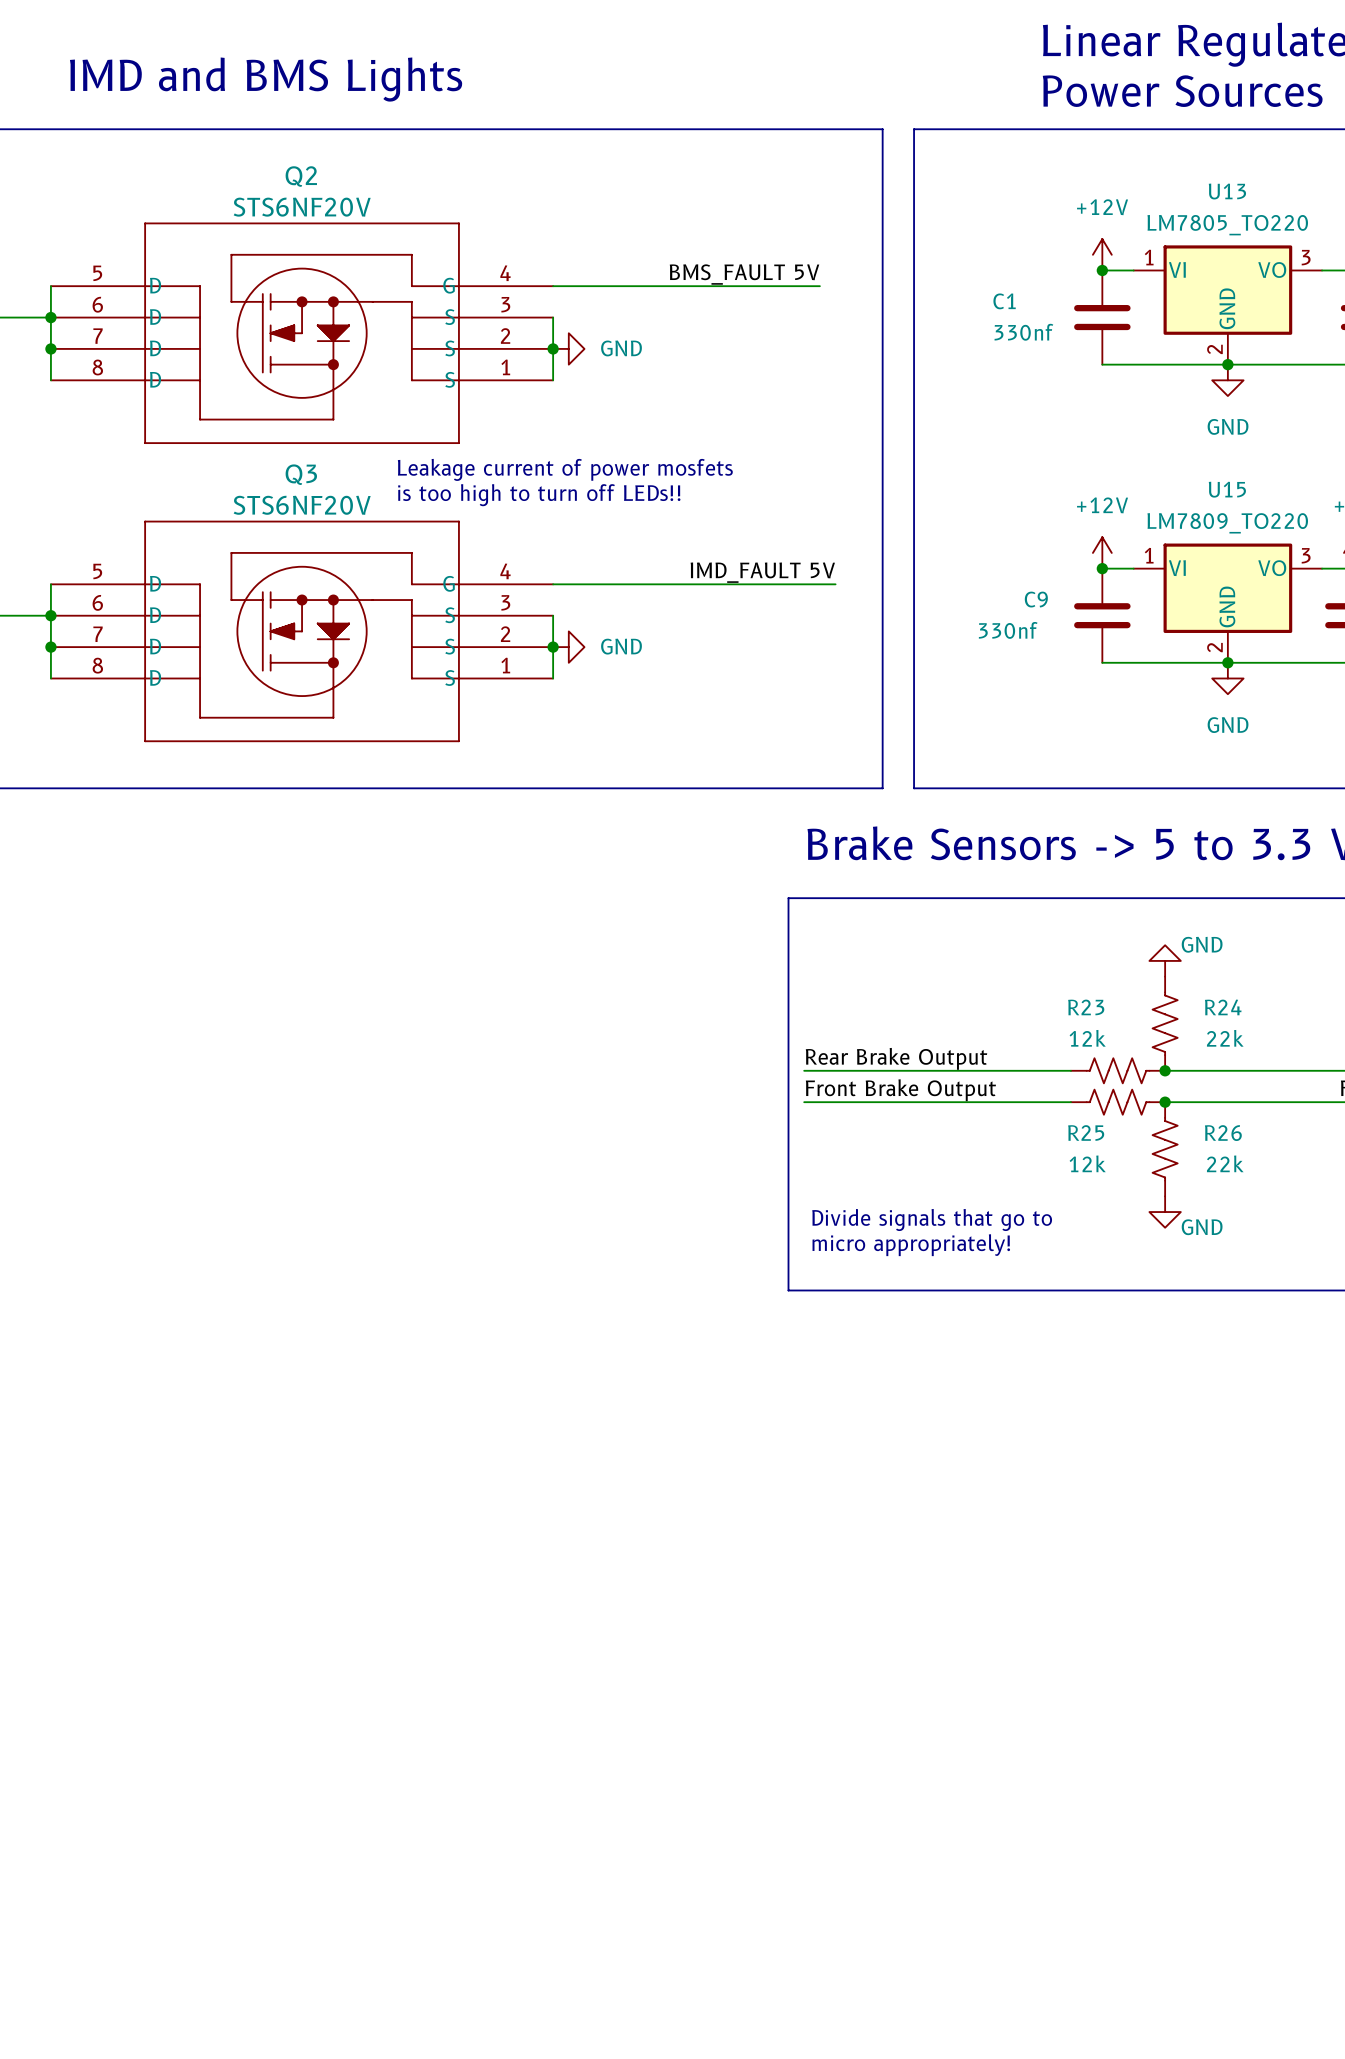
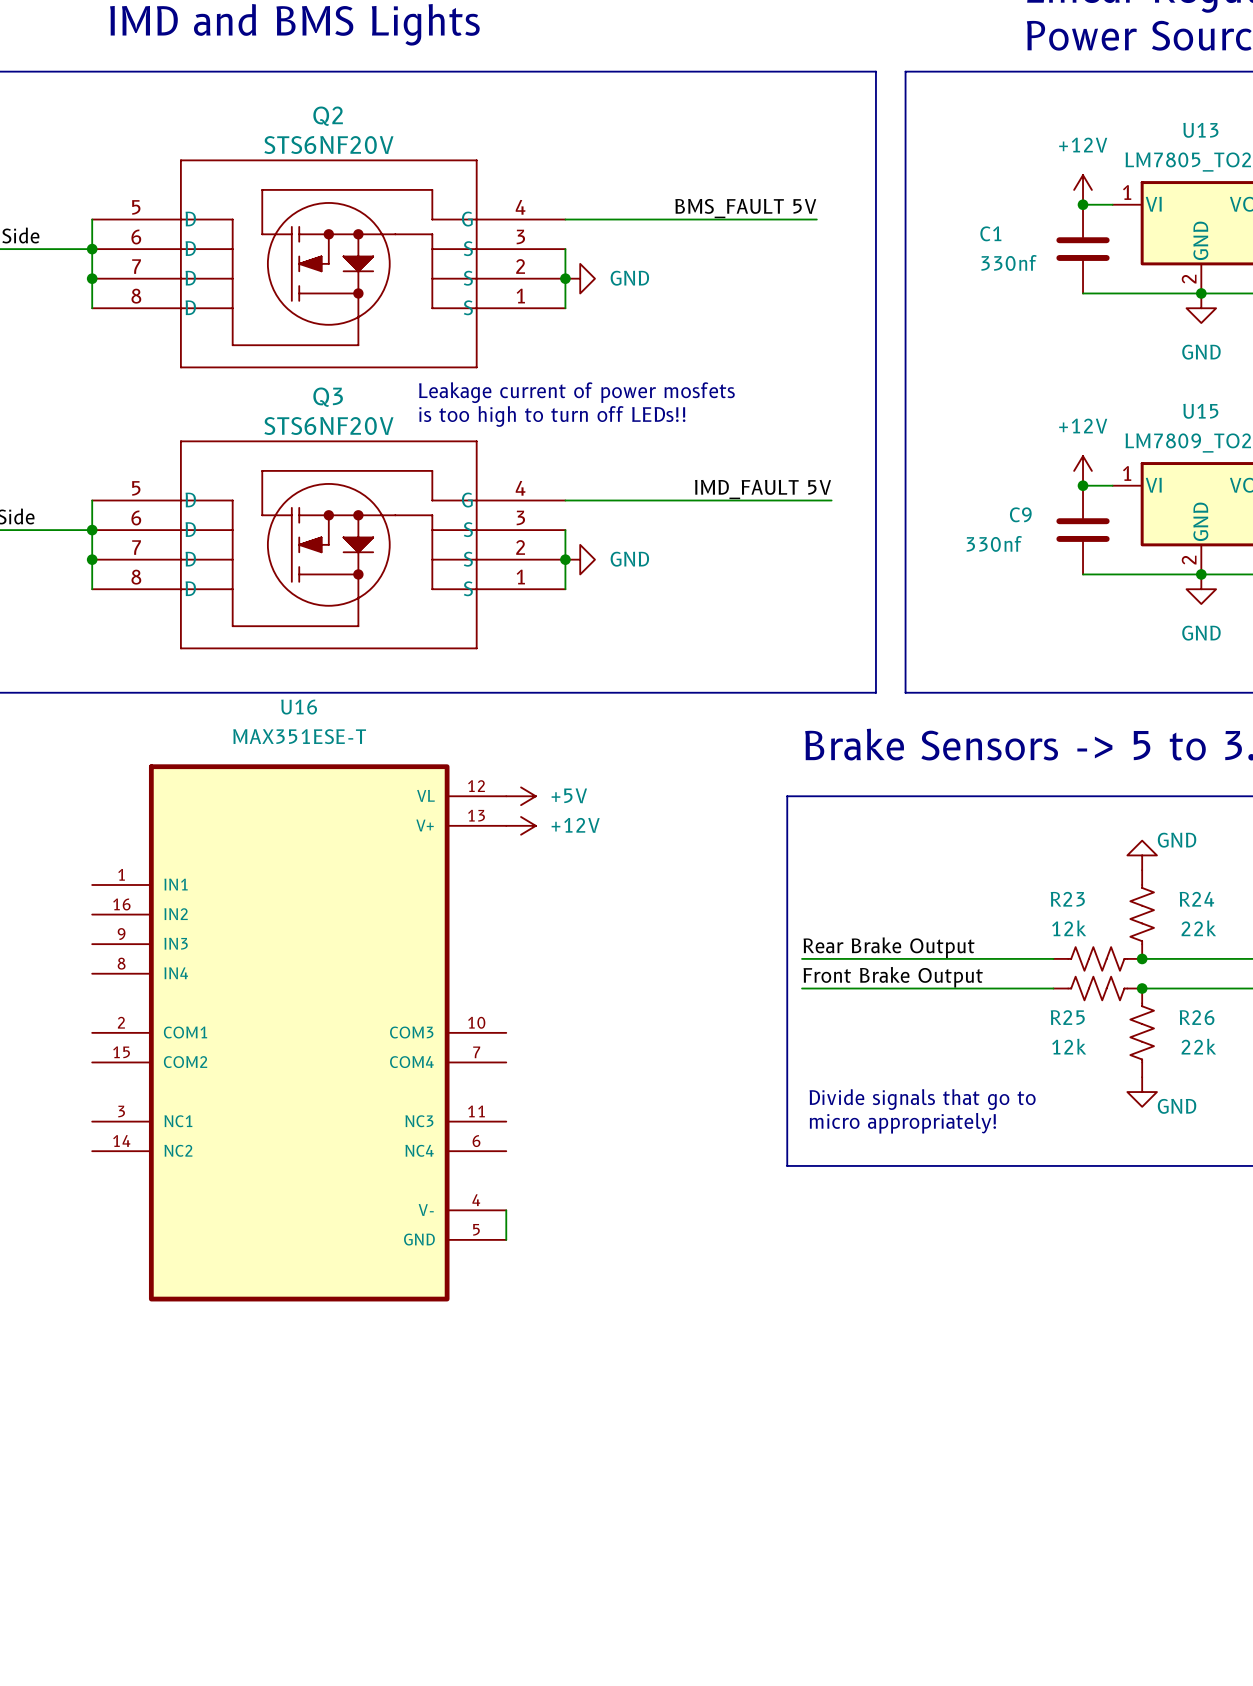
power symbol: none -> +5V (521, 796)
power symbol: none -> +12V (521, 825)
U16: none -> MAX351ESE-T (299, 1032)
wire: none -> (506, 1210) (506, 1239)

